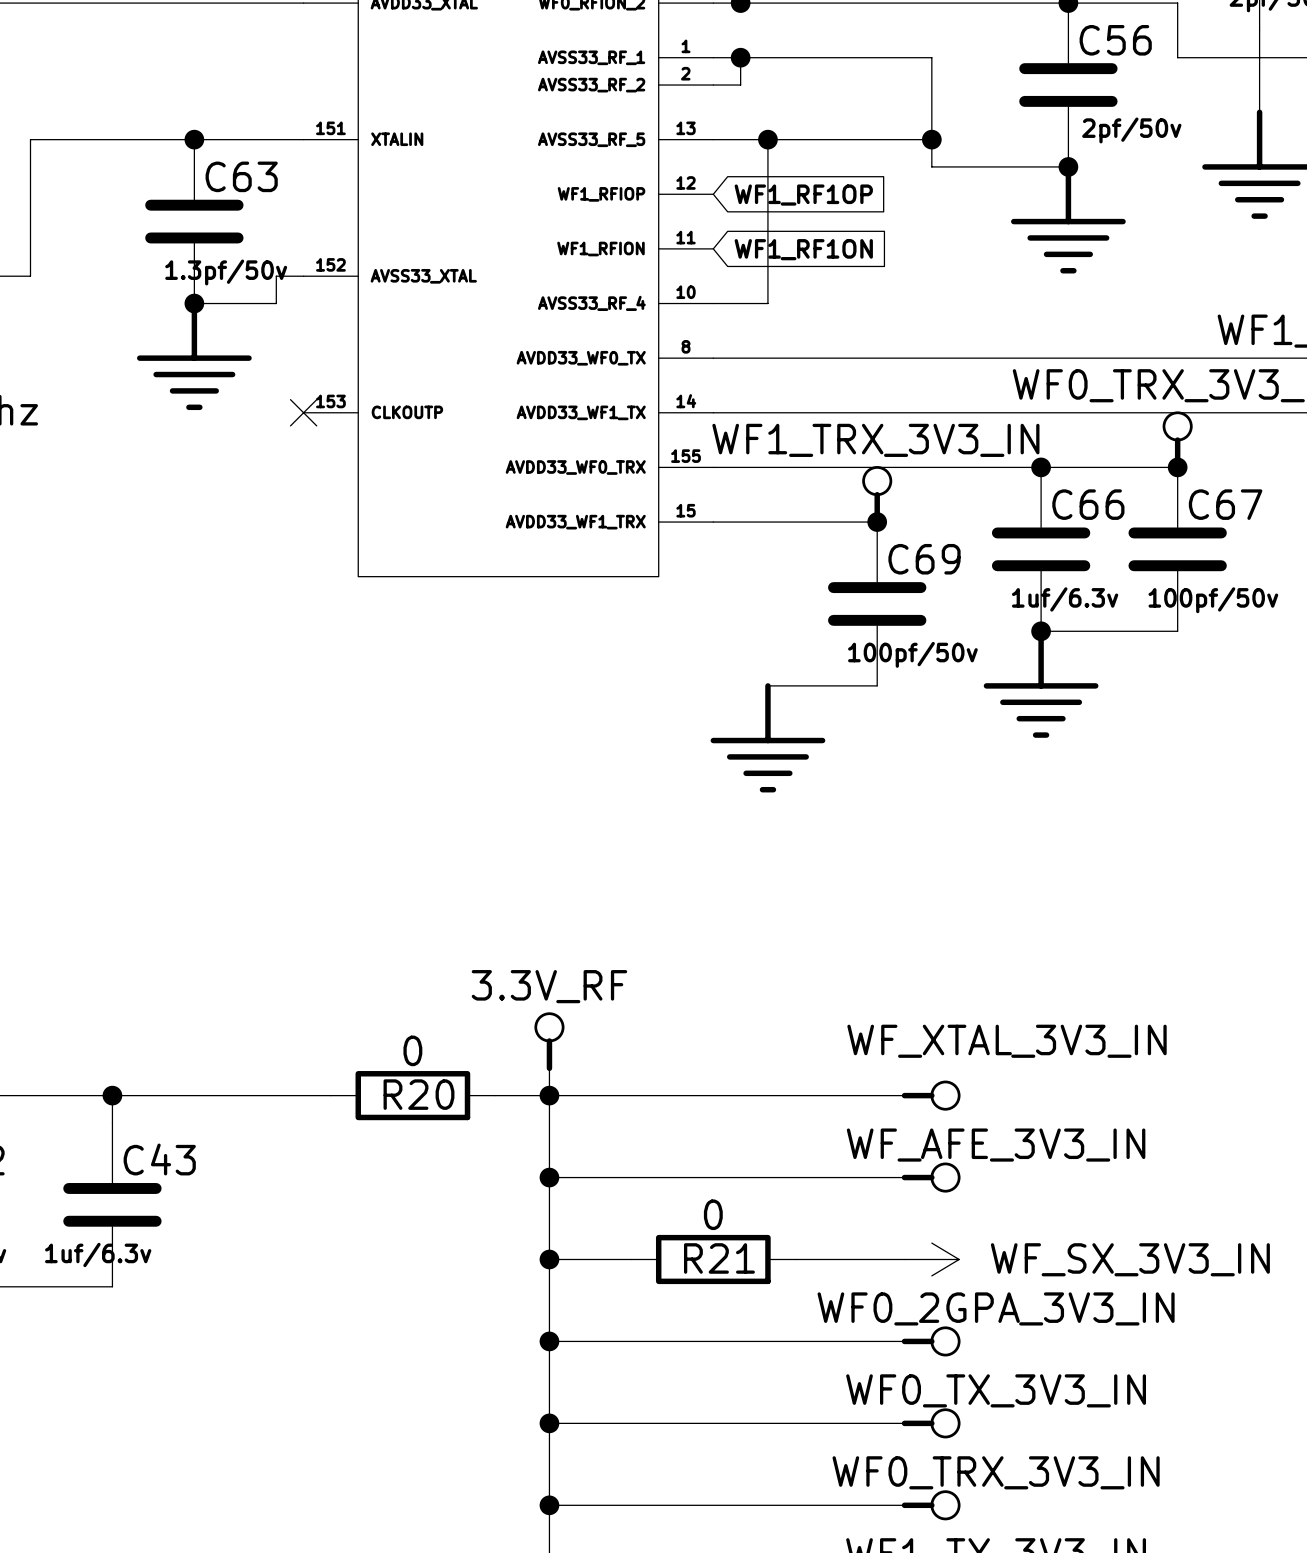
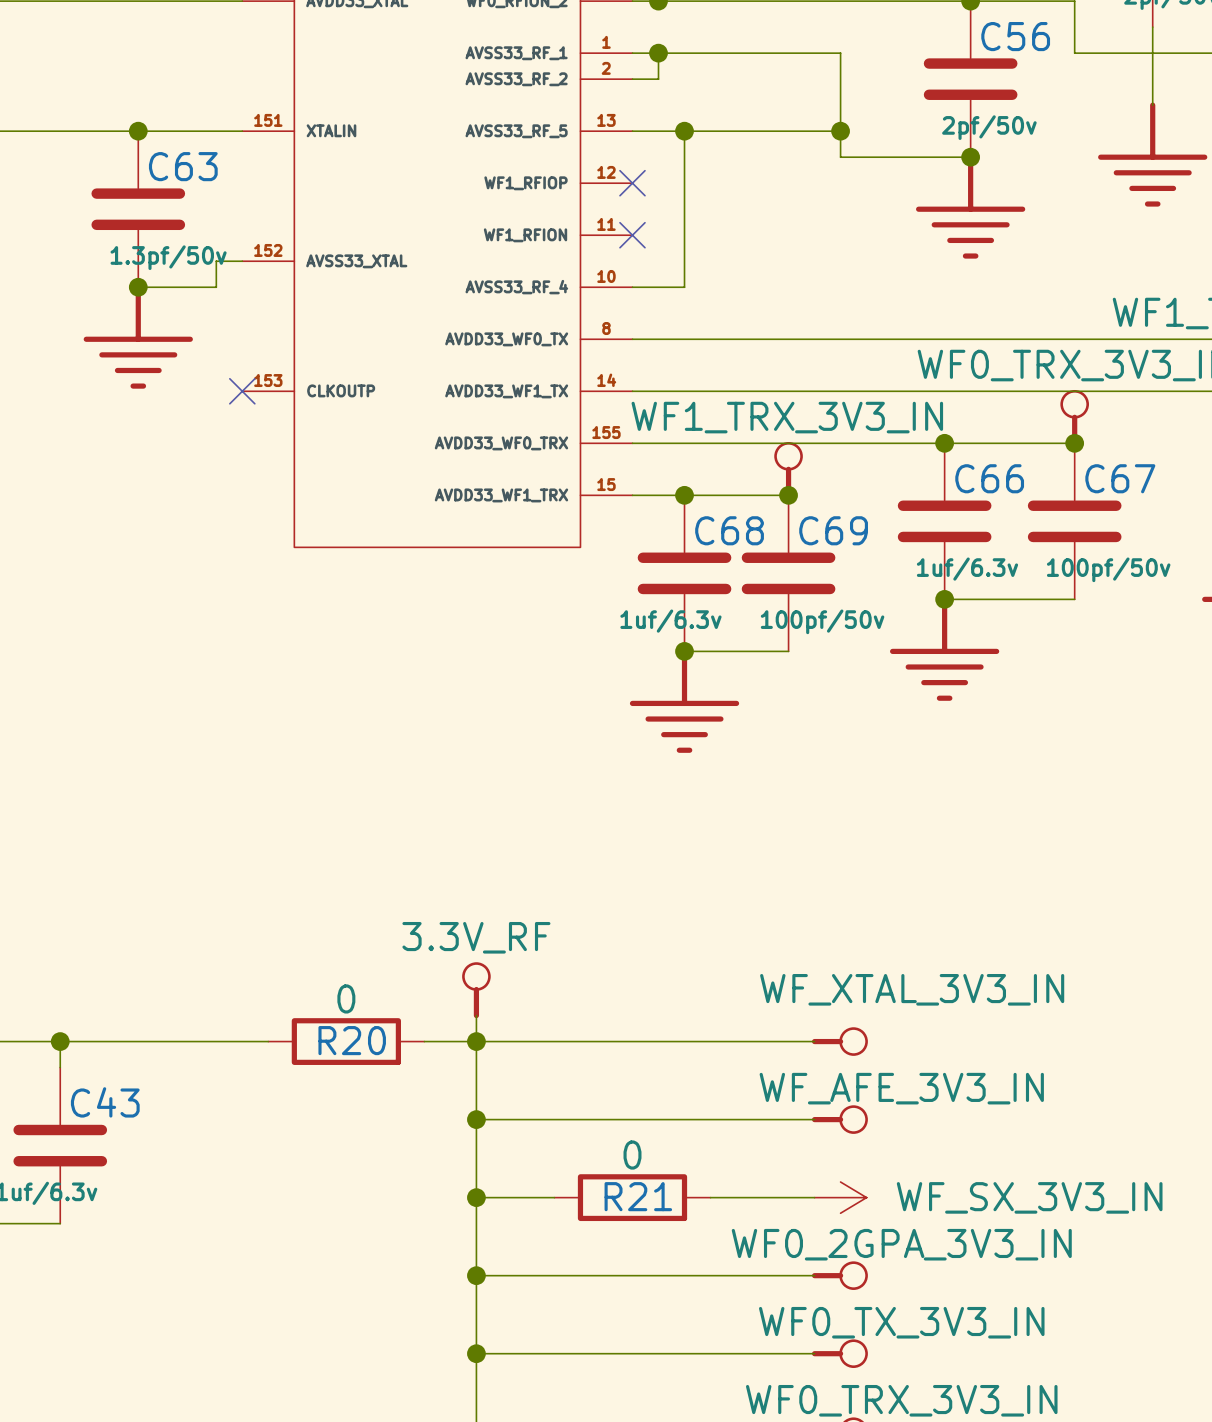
C56 value position: 2pf/50v (1131, 130) -> 2pf/50v (989, 127)
no-connect mark: none -> (632, 183)
global label: WF1_RF1OP (803, 195) -> none
no-connect mark: none -> (632, 235)
global label: WF1_RF1ON (803, 249) -> none
junction: none -> (684, 495)
C68: none -> 1uf/6.3v (684, 573)
junction: none -> (684, 651)

